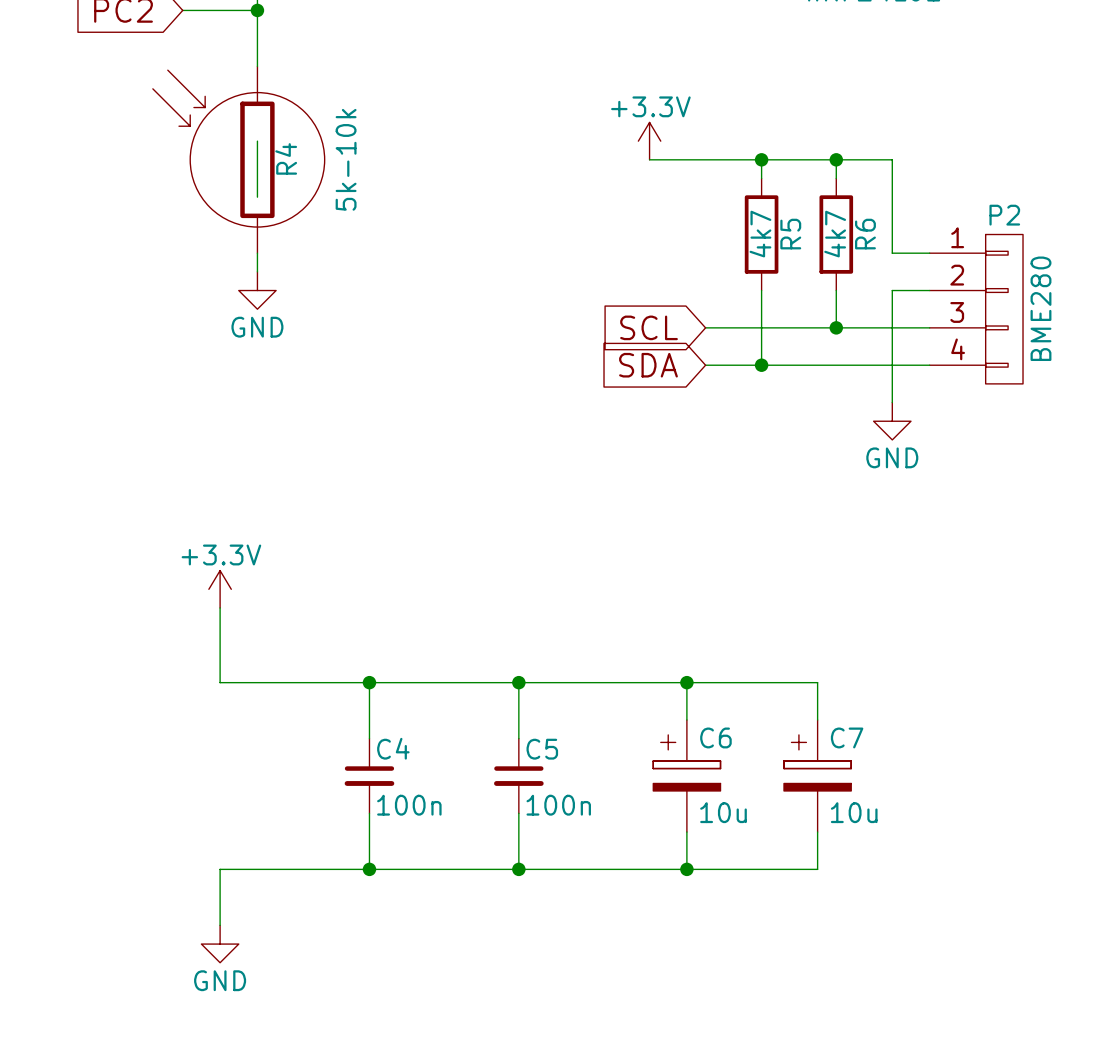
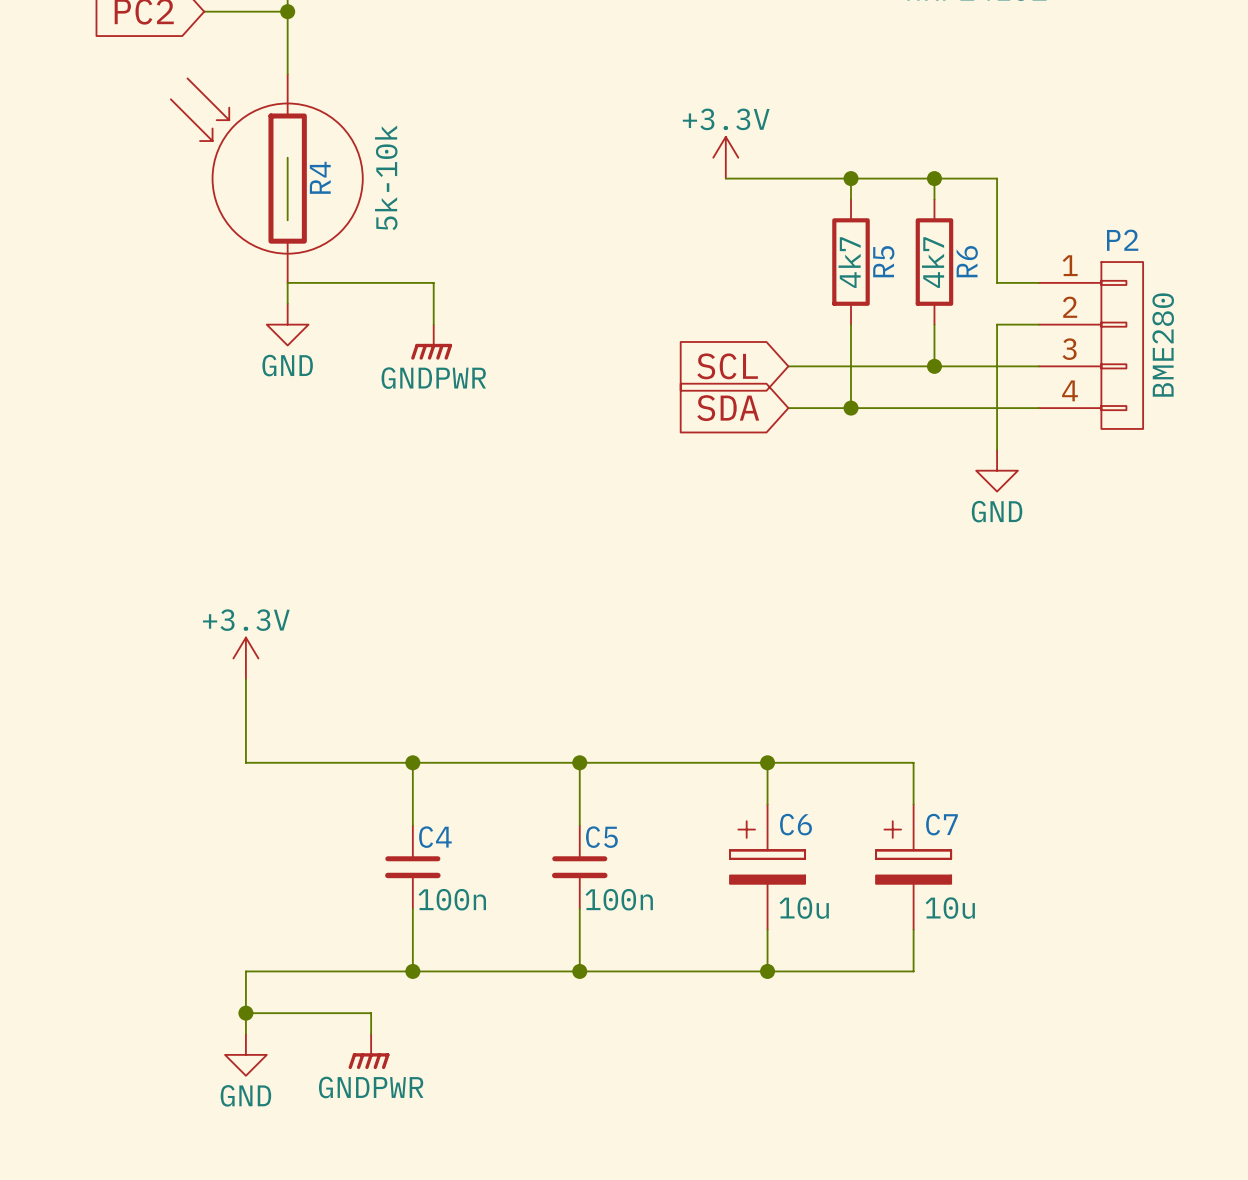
wire: none -> (287, 282) (433, 282) (433, 324)
power symbol: none -> GNDPWR (431, 342)
wire: none -> (245, 1013) (371, 1013) (371, 1034)
junction: none -> (245, 1013)
power symbol: none -> GNDPWR (369, 1051)

